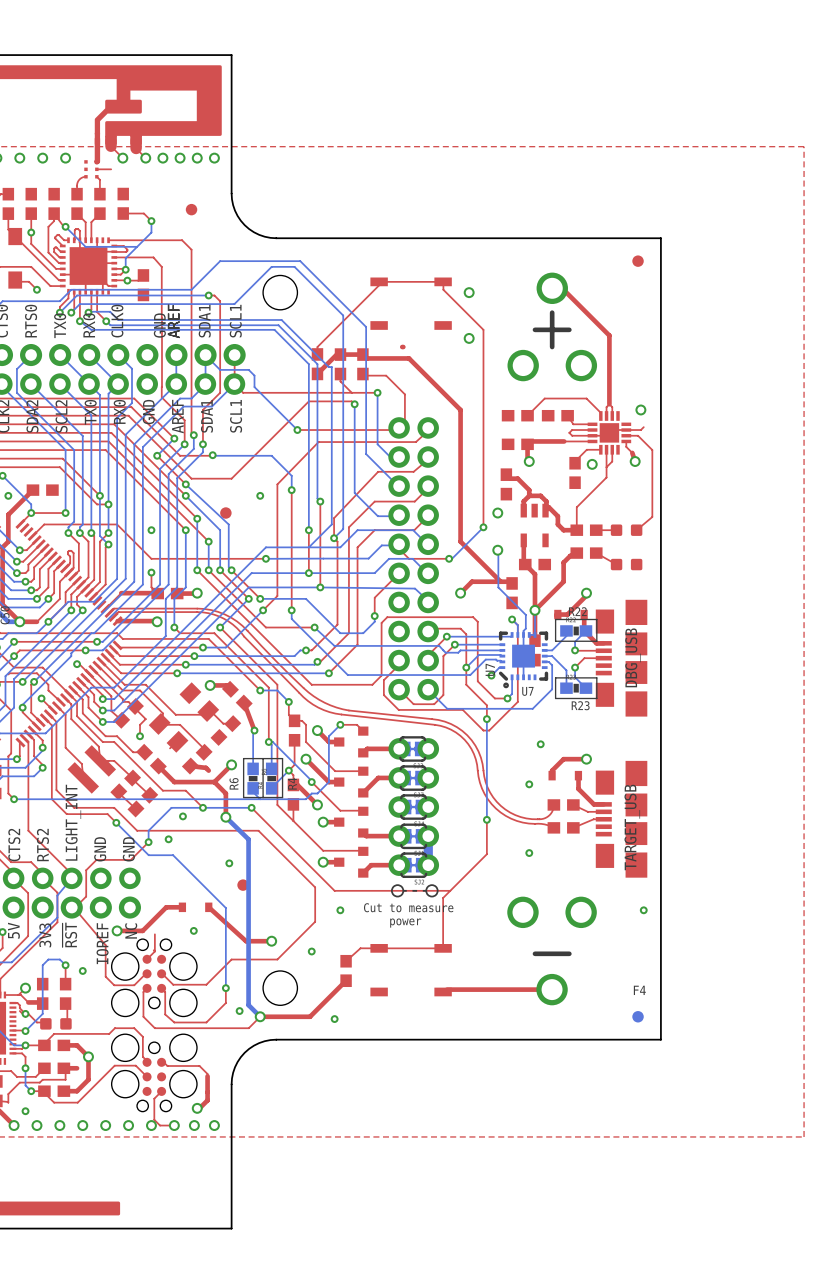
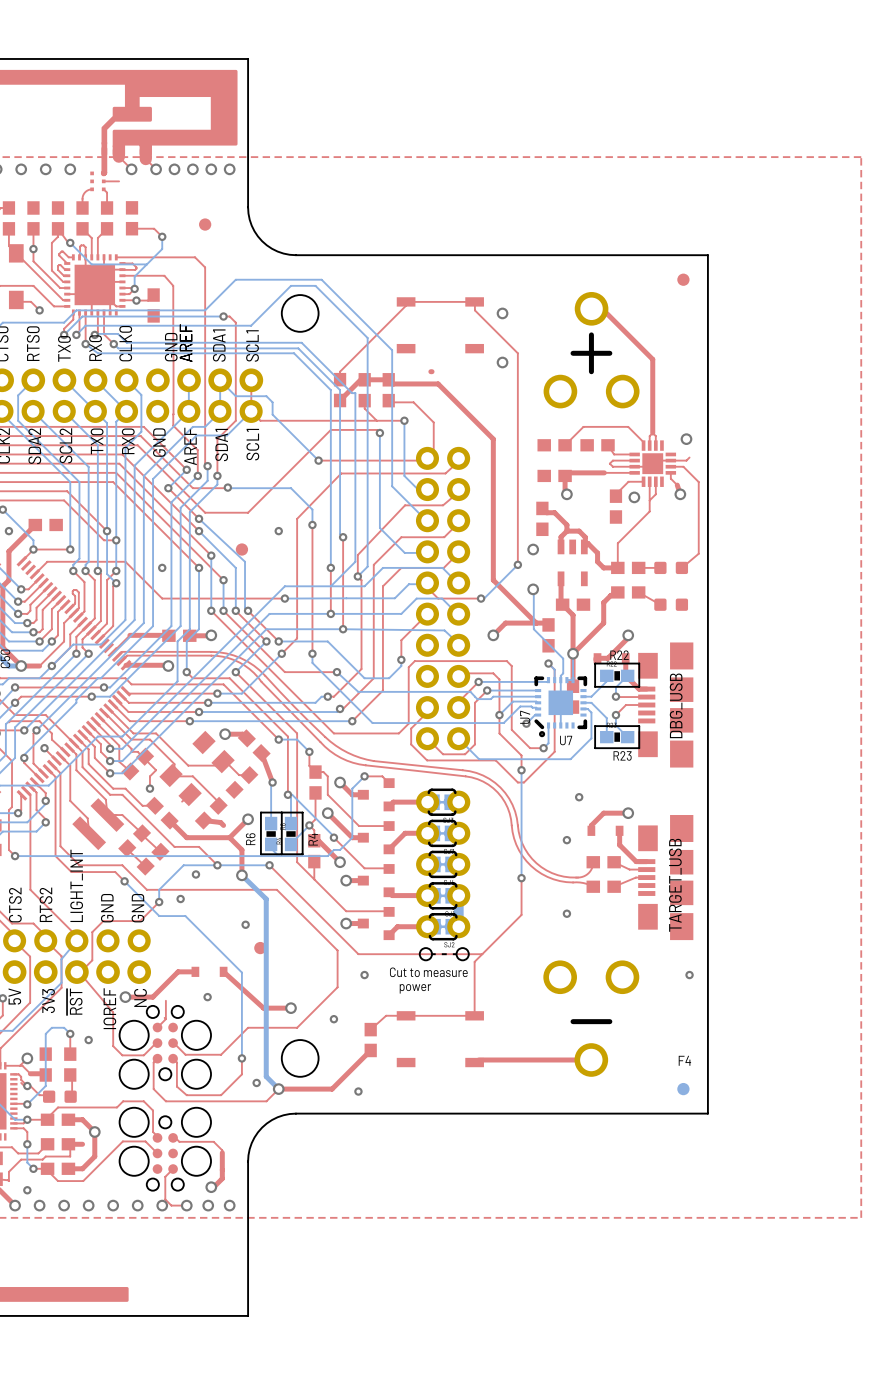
top track: (151, 572) (151, 587) (157, 593) -> none
via: (151, 572) -> none
top track: (77, 664) (89, 674) -> none
via: (77, 664) -> none

